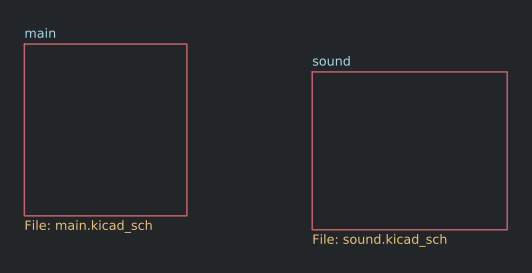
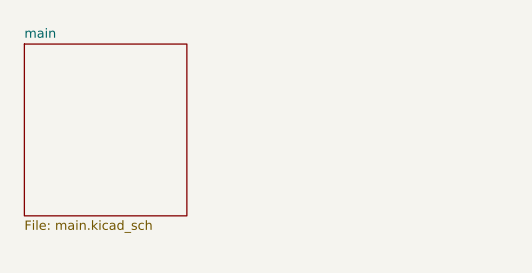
sheet sound: File: sound.kicad_sch (409, 150) -> none

